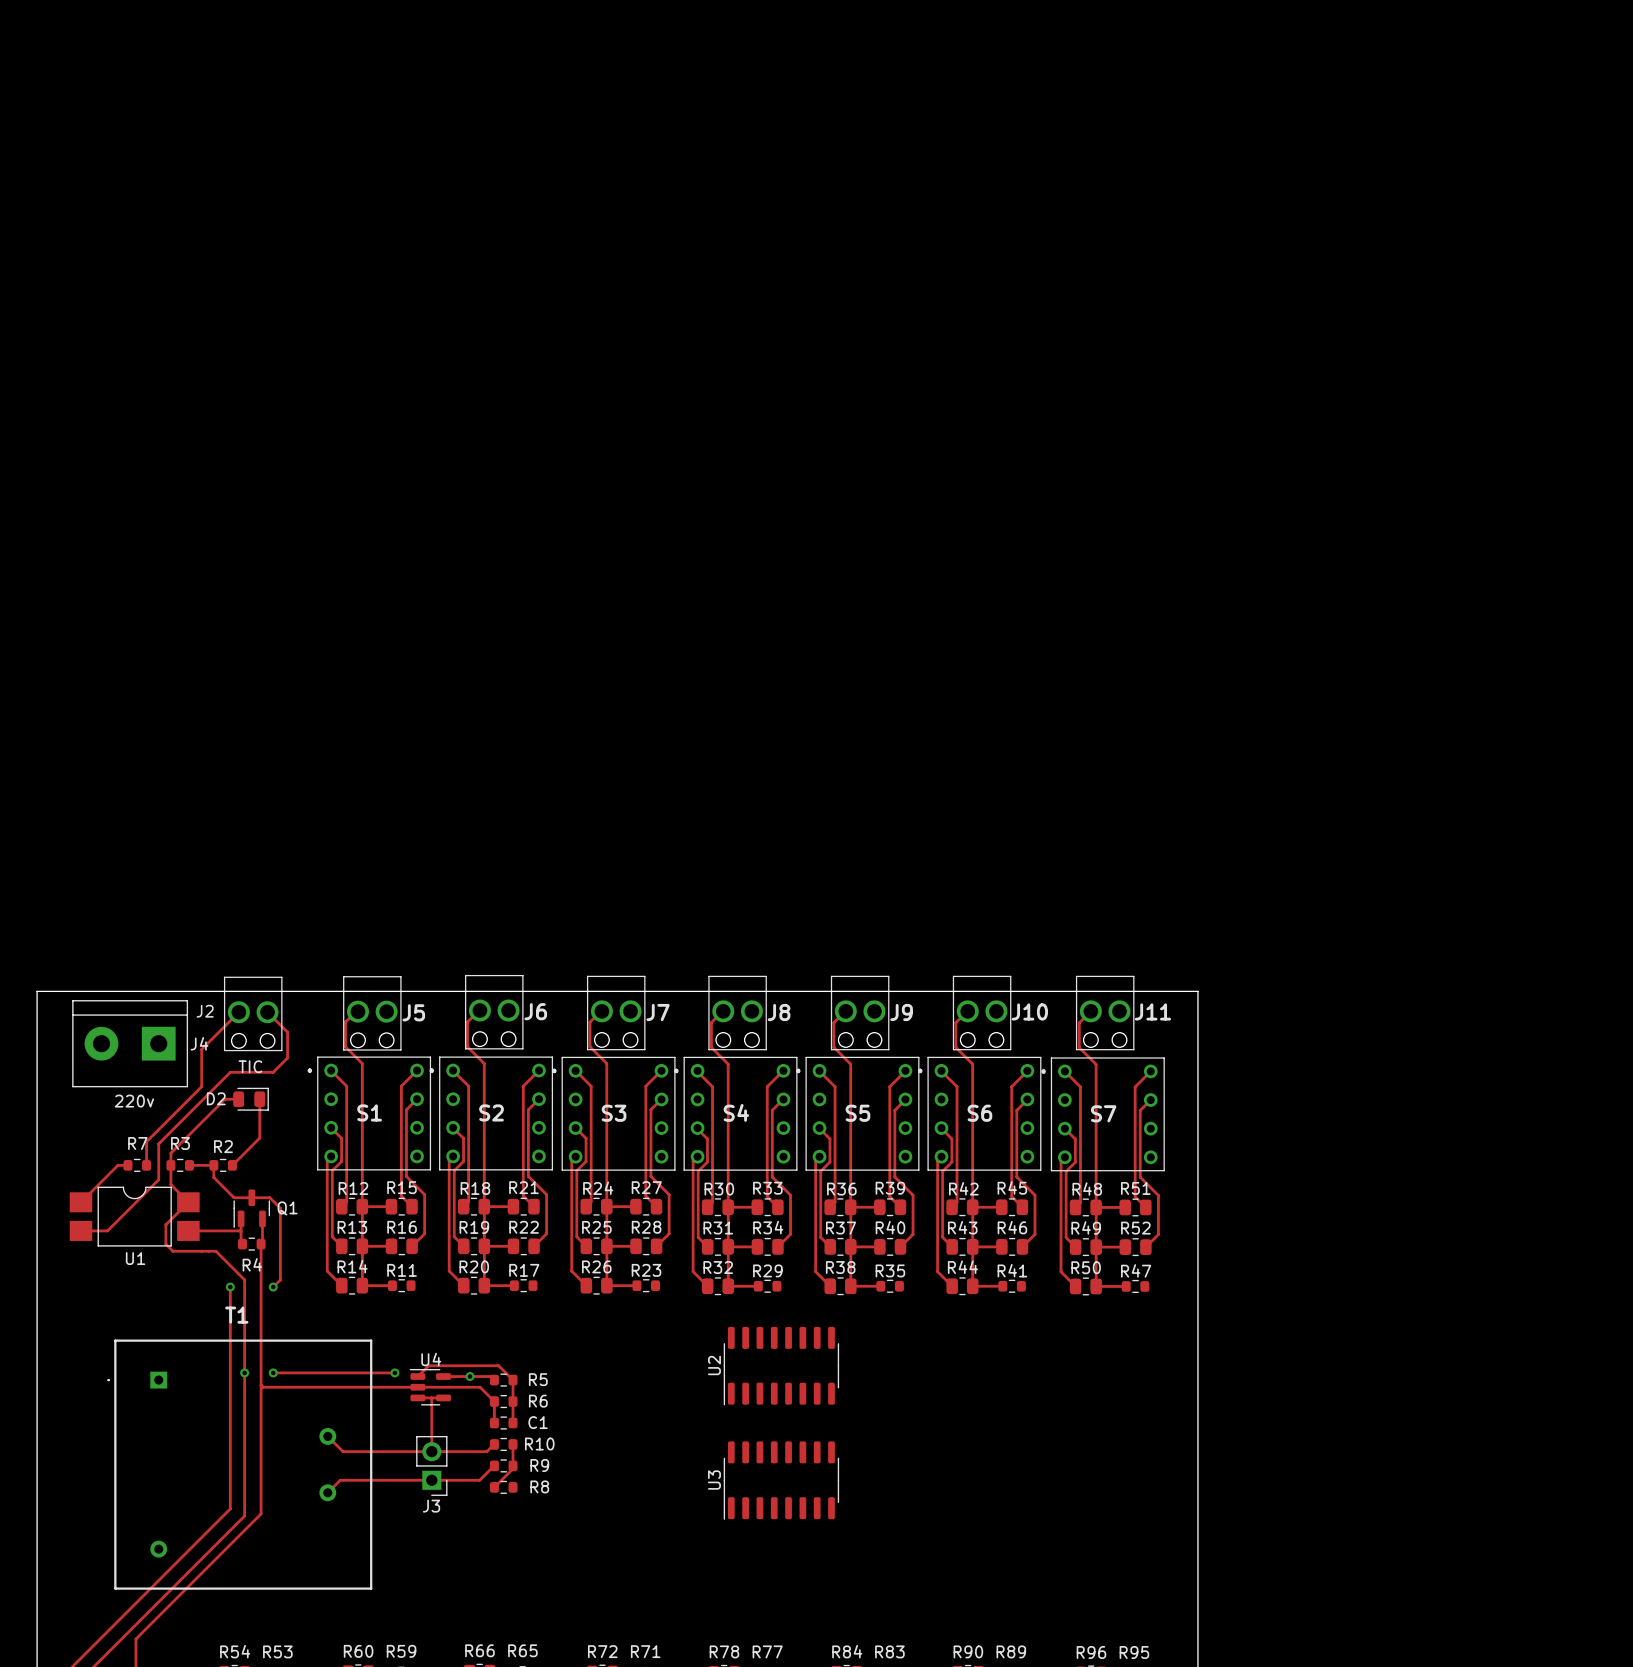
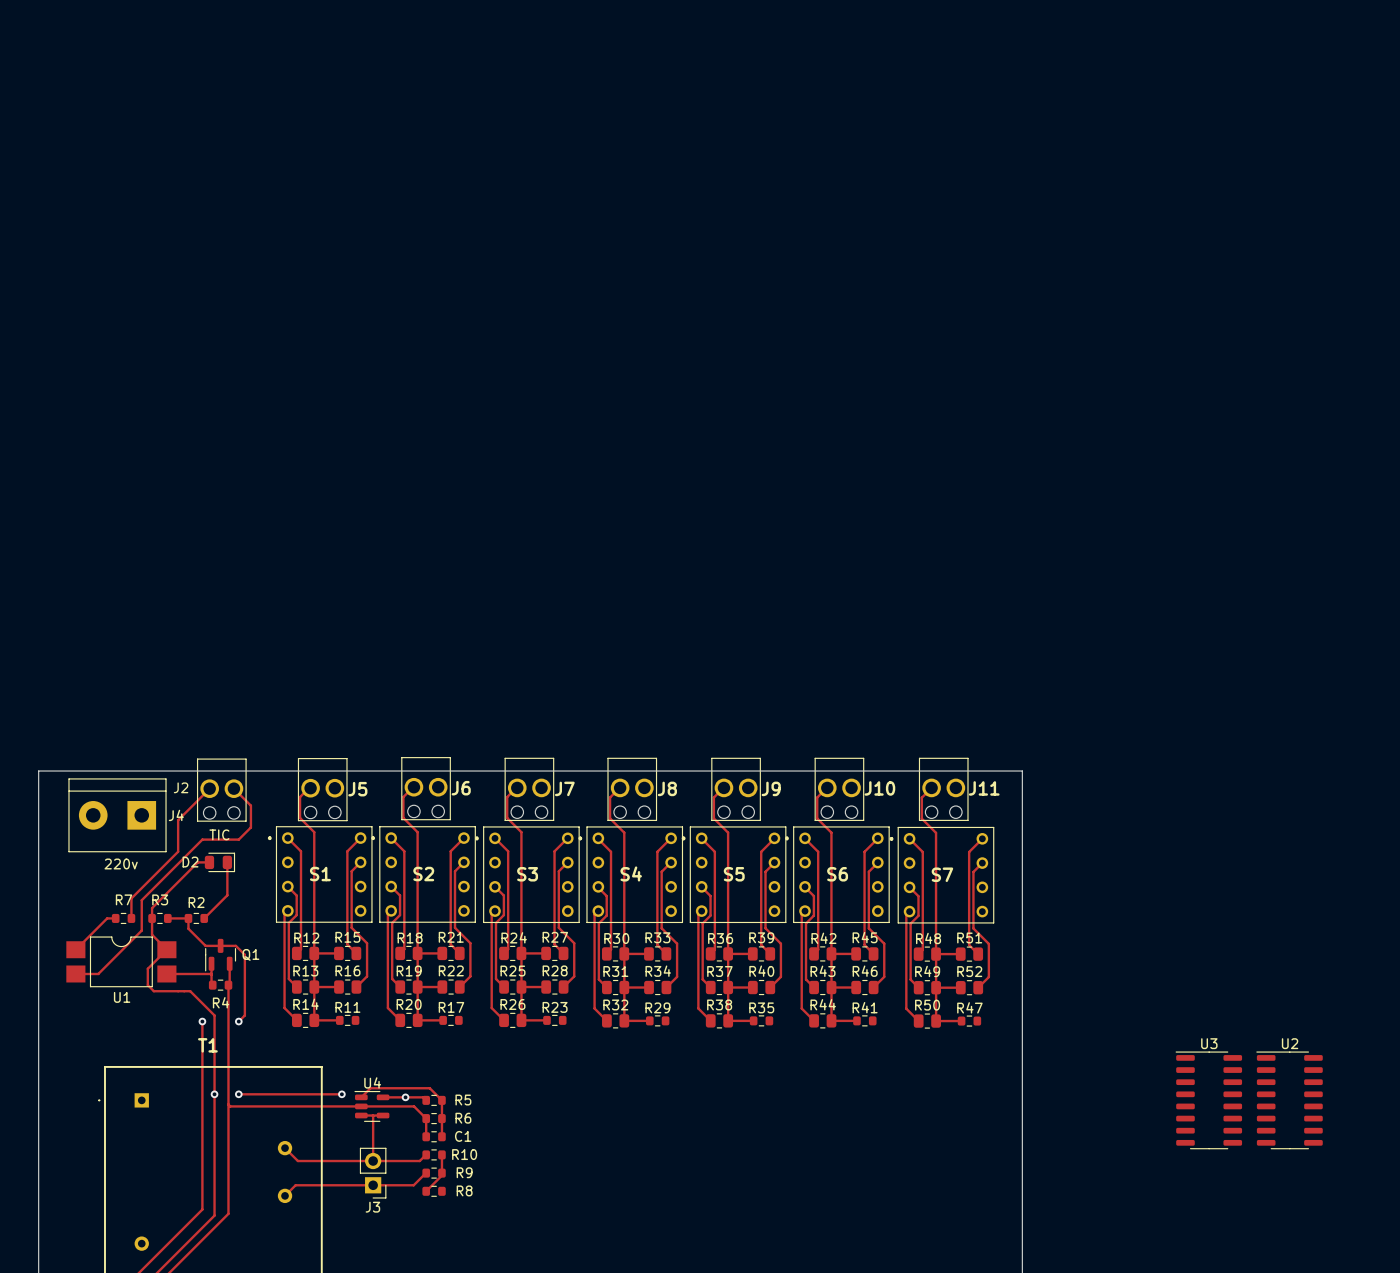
U2 rotation: 0° (781, 1366) -> 90° clockwise (1289, 1100)
U2 position: (781, 1366) -> (1289, 1100)
U3 rotation: 0° (781, 1480) -> 90° clockwise (1208, 1100)
U3 position: (781, 1480) -> (1208, 1100)

